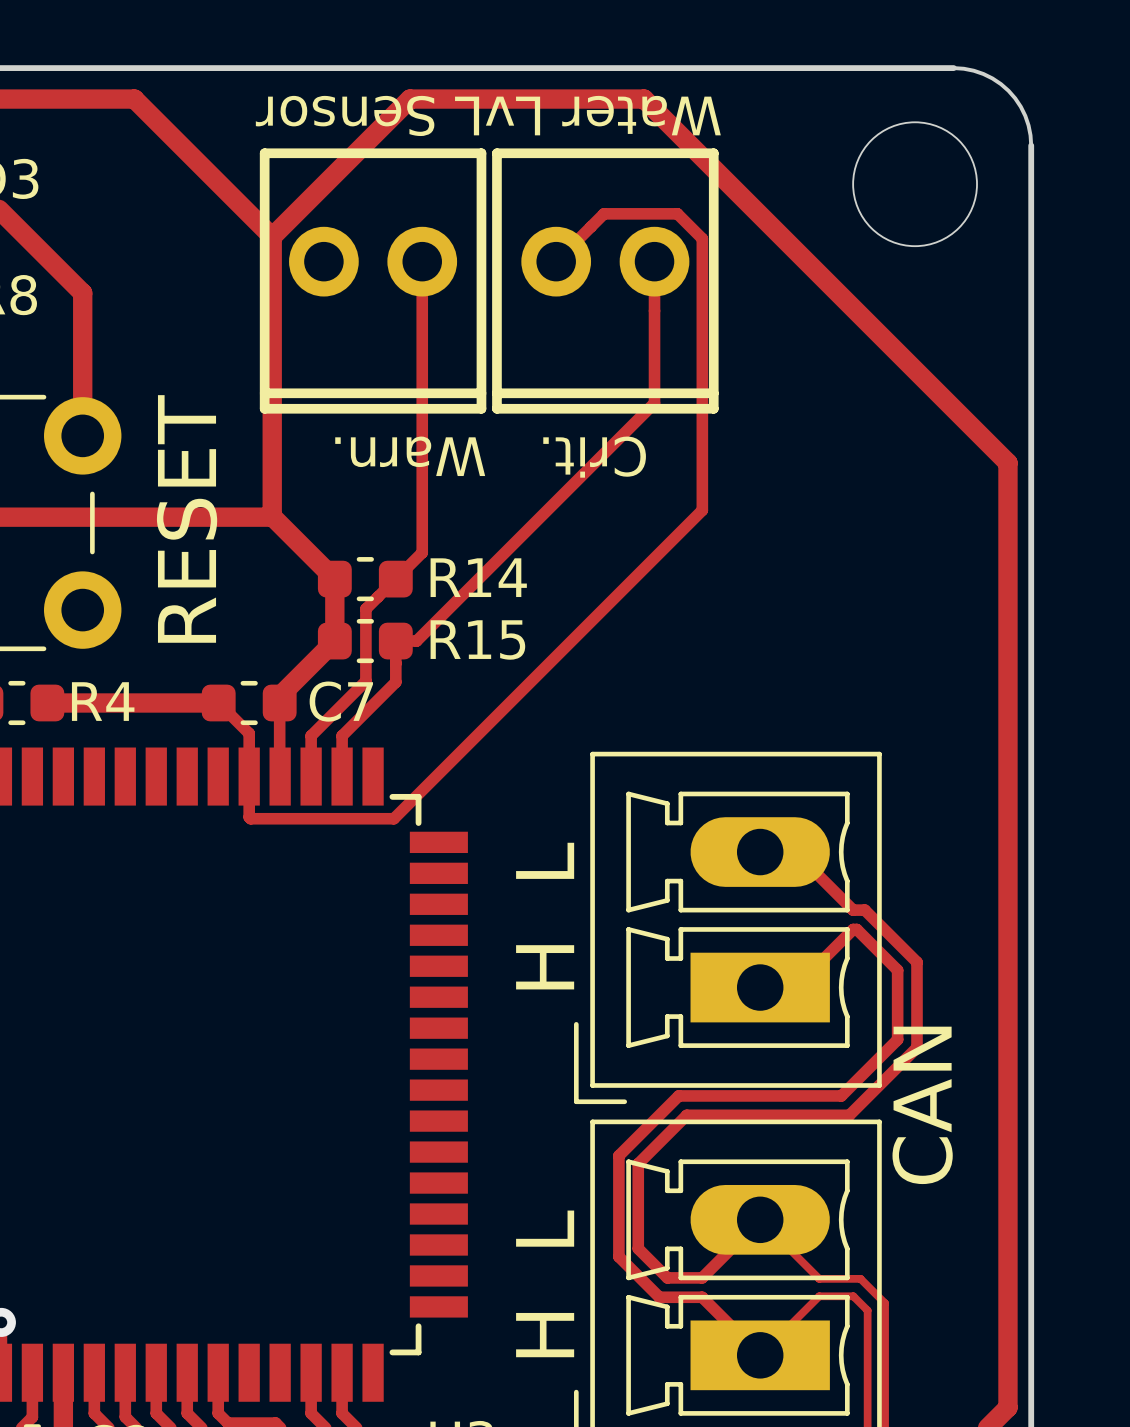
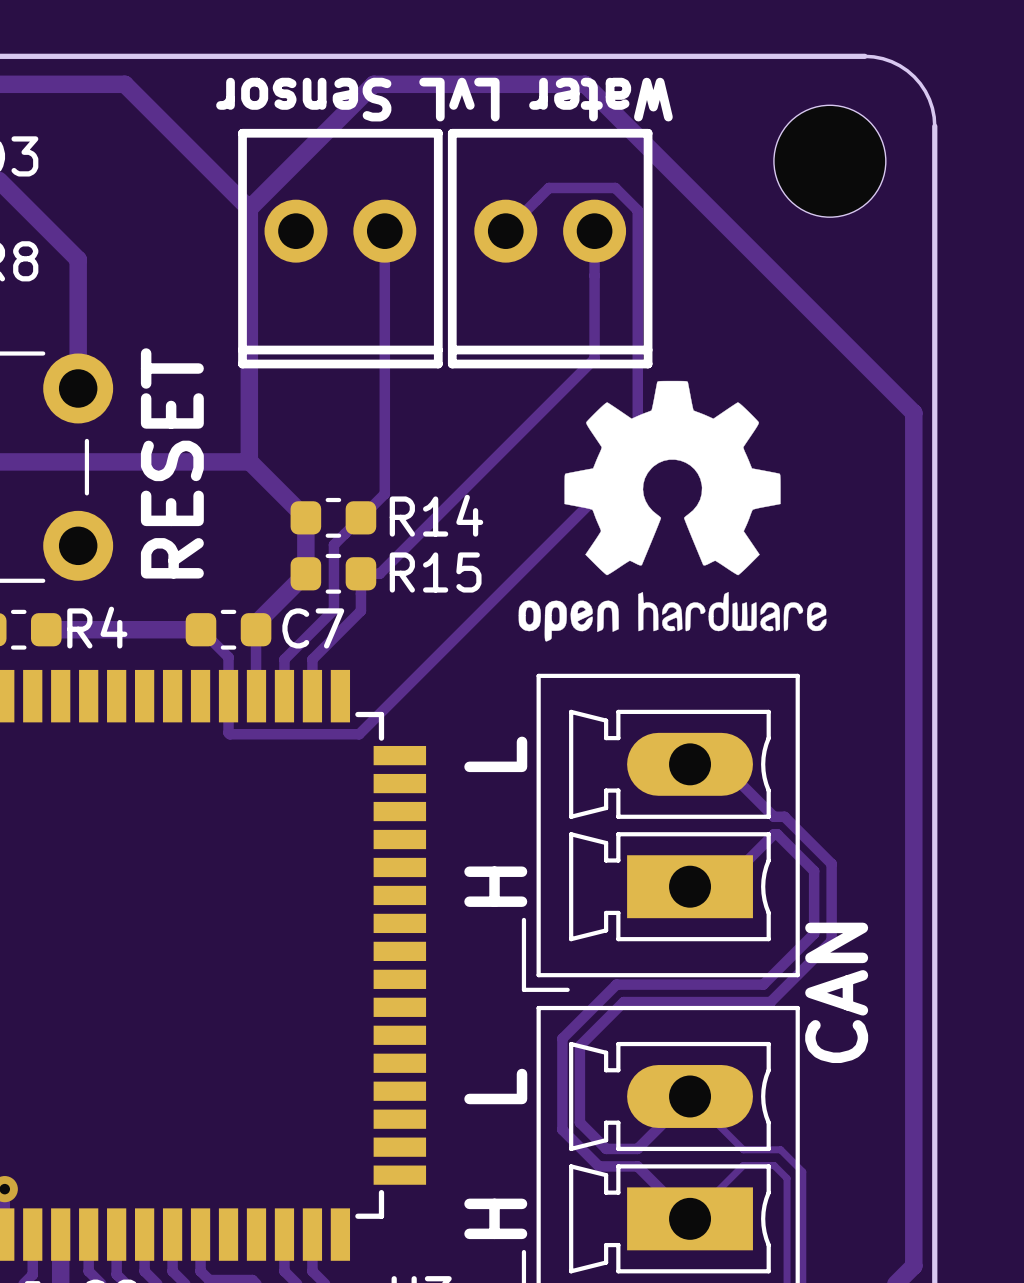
drawing: none -> [518, 380, 827, 642]
text: Crit. Warn. (490, 457) -> none

